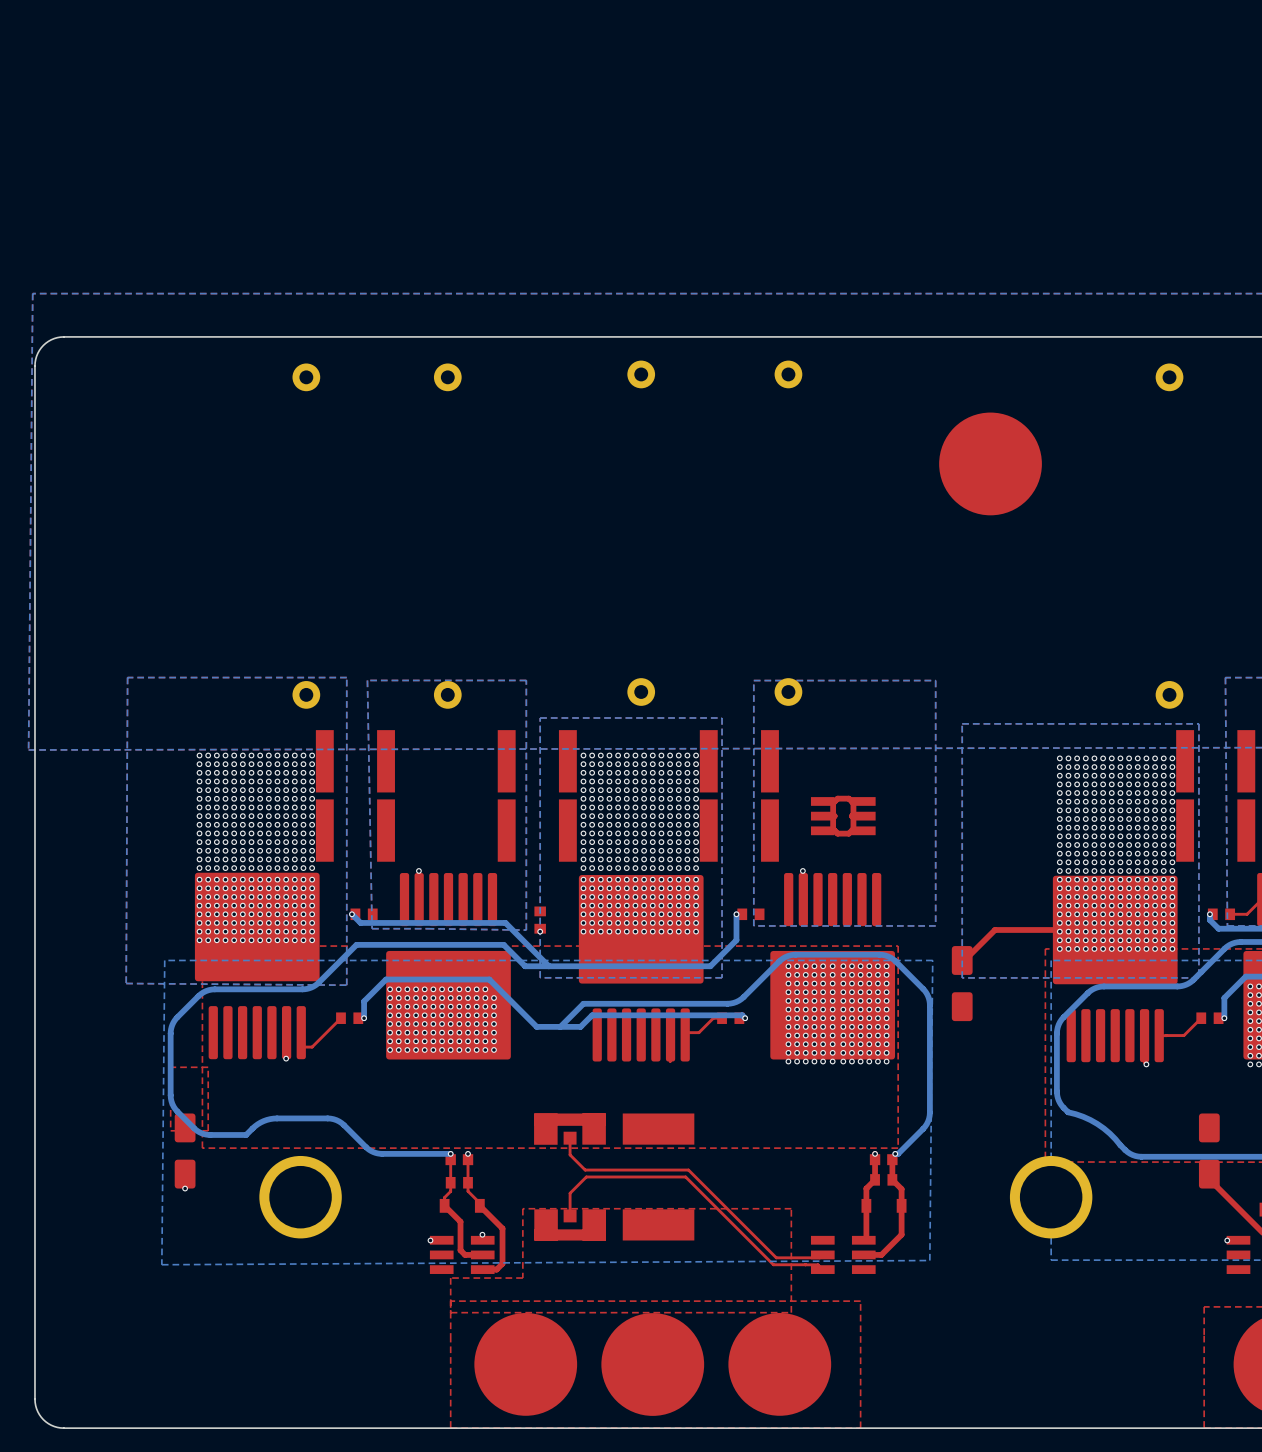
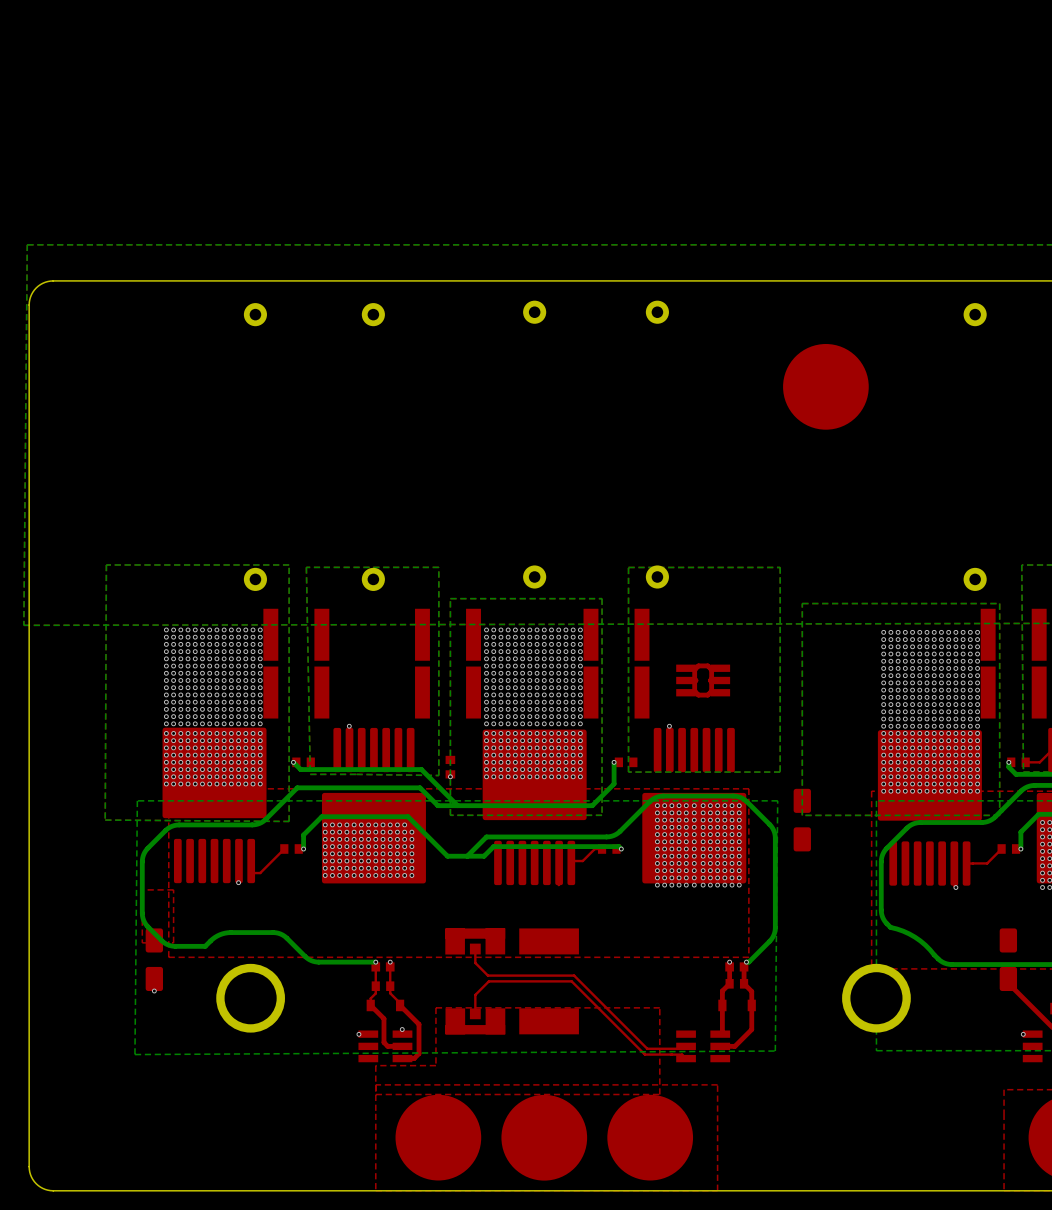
top track: (1115, 929) (995, 929) (964, 960) (962, 960) -> none

